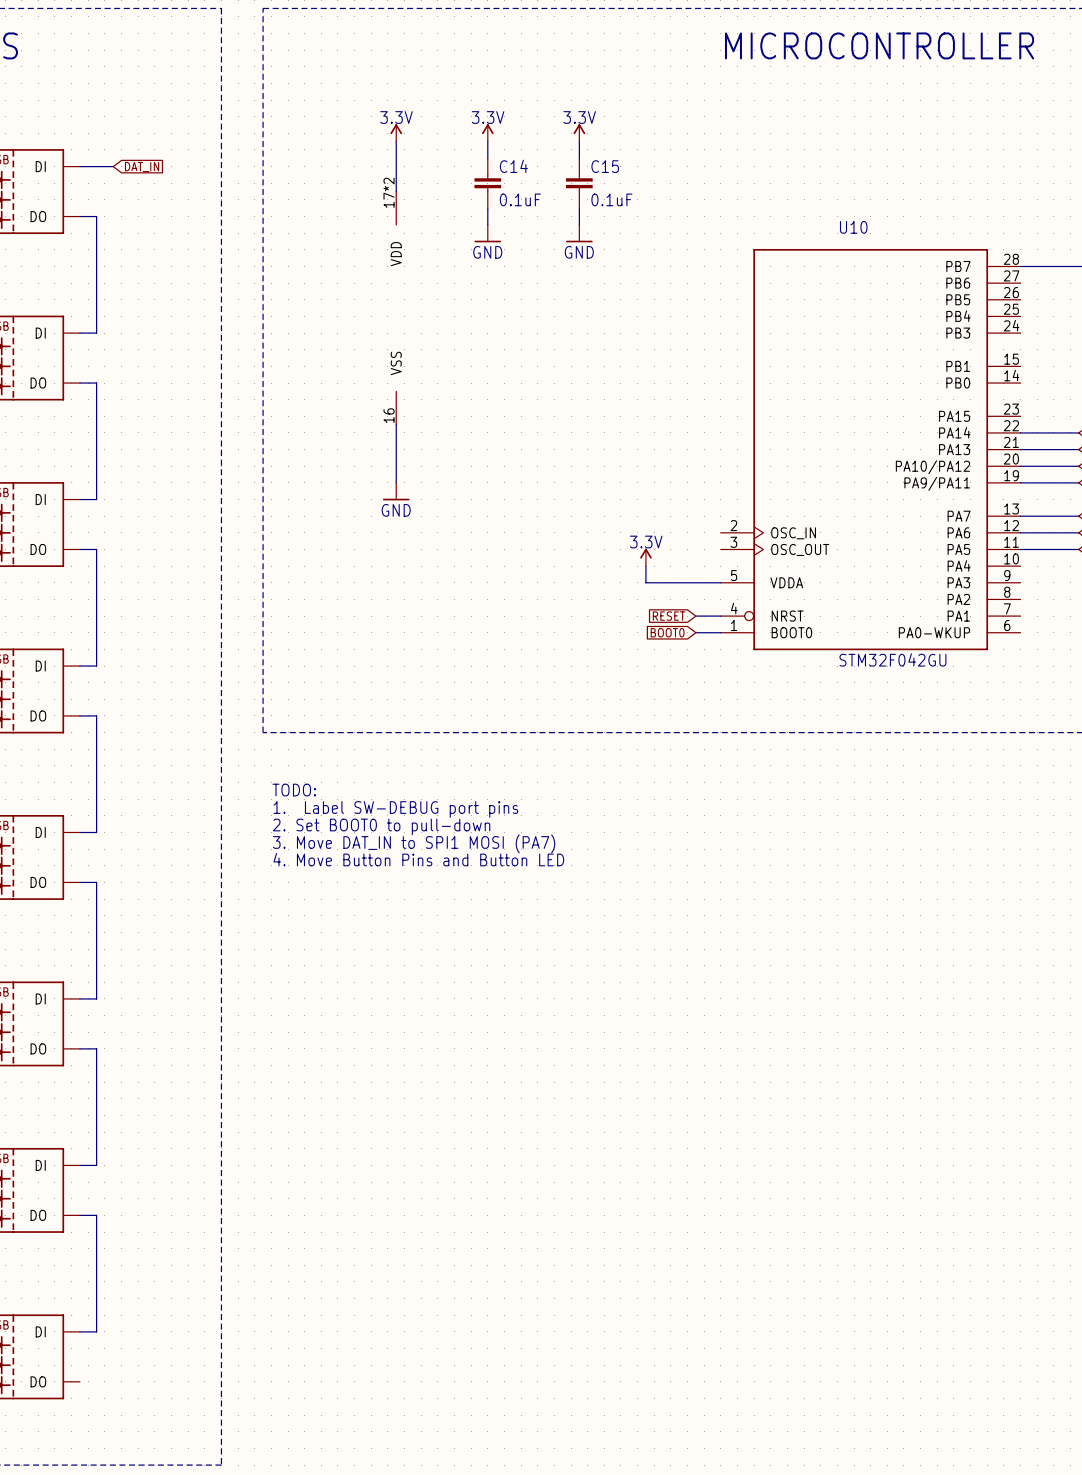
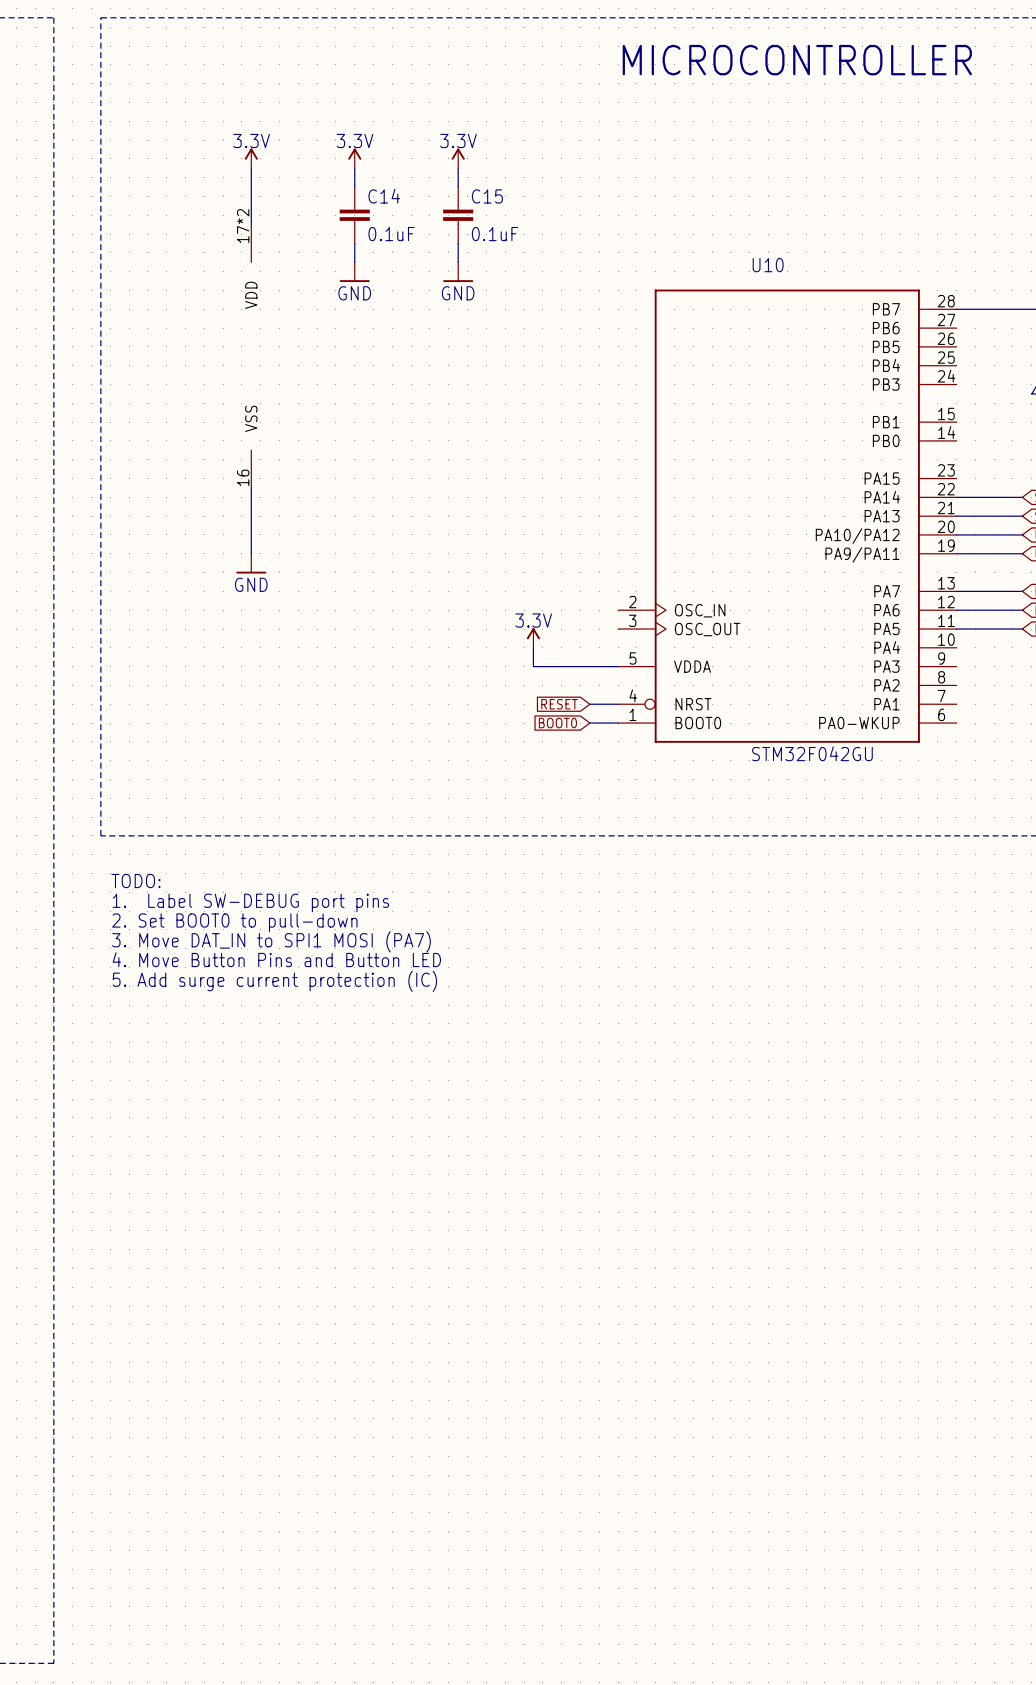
text: none -> TODO: (136, 881)
text: TODO: (294, 790) -> 1. Label SW-DEBUG port pins (250, 902)
text: 1. Label SW-DEBUG port pins (395, 809) -> 2. Set BOOT0 to pull-down (234, 922)
text: 2. Set BOOT0 to pull-down (381, 826) -> 3. Move DAT_IN to SPI1 MOSI (PA7) (271, 941)
text: 3. Move DAT_IN to SPI1 MOSI (PA7) (414, 843) -> 4. Move Button Pins and Button LED (276, 959)
text: 4. Move Button Pins and Button LED (418, 859) -> 5. Add surge current protection (IC) (274, 981)

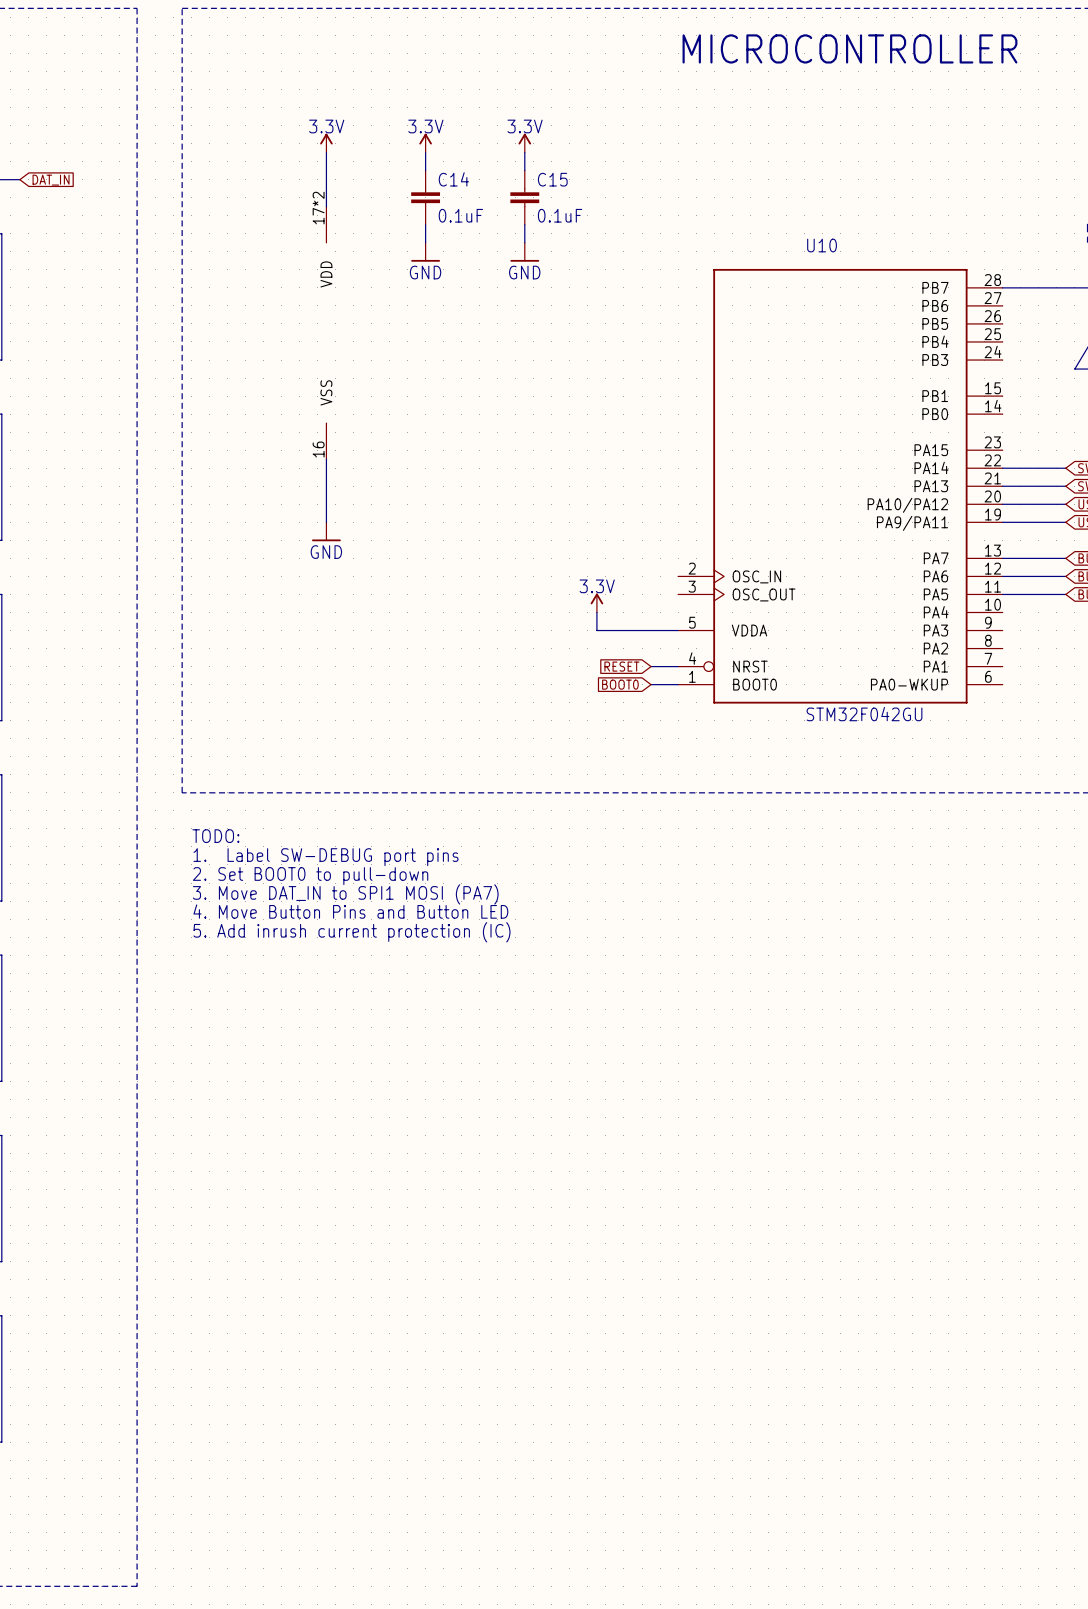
text: 5. Add surge current protection (IC) (274, 981) -> 5. Add inrush current protection (IC) (351, 932)

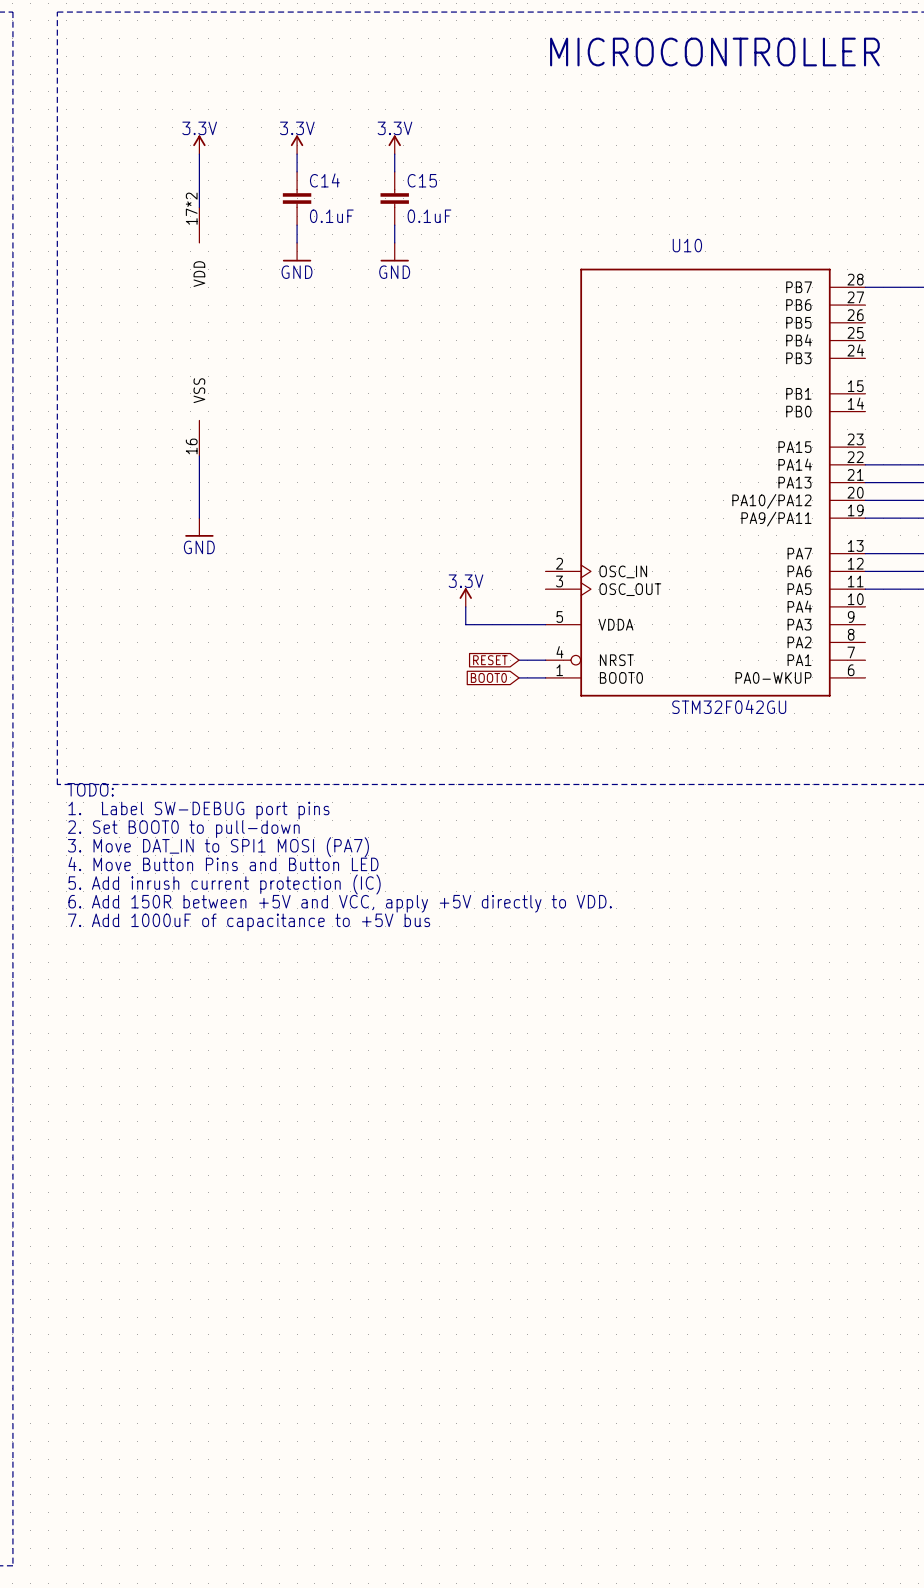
text: none -> TODO: (90, 789)
text: none -> 1. Label SW-DEBUG port pins (198, 810)
text: TODO: (215, 836) -> 2. Set BOOT0 to pull-down (183, 829)
text: 1. Label SW-DEBUG port pins (326, 857) -> 3. Move DAT_IN to SPI1 MOSI (PA7) (218, 847)
text: 2. Set BOOT0 to pull-down (310, 876) -> 4. Move Button Pins and Button LED (223, 864)
text: 3. Move DAT_IN to SPI1 MOSI (PA7) (345, 894) -> 5. Add inrush current protection (IC) (224, 884)
text: 4. Move Button Pins and Button LED (350, 911) -> 6. Add 150R between +5V and VCC, apply +5V directly to VDD. (340, 903)
text: 5. Add inrush current protection (IC) (351, 932) -> 7. Add 1000uF of capacitance to +5V bus (249, 922)

